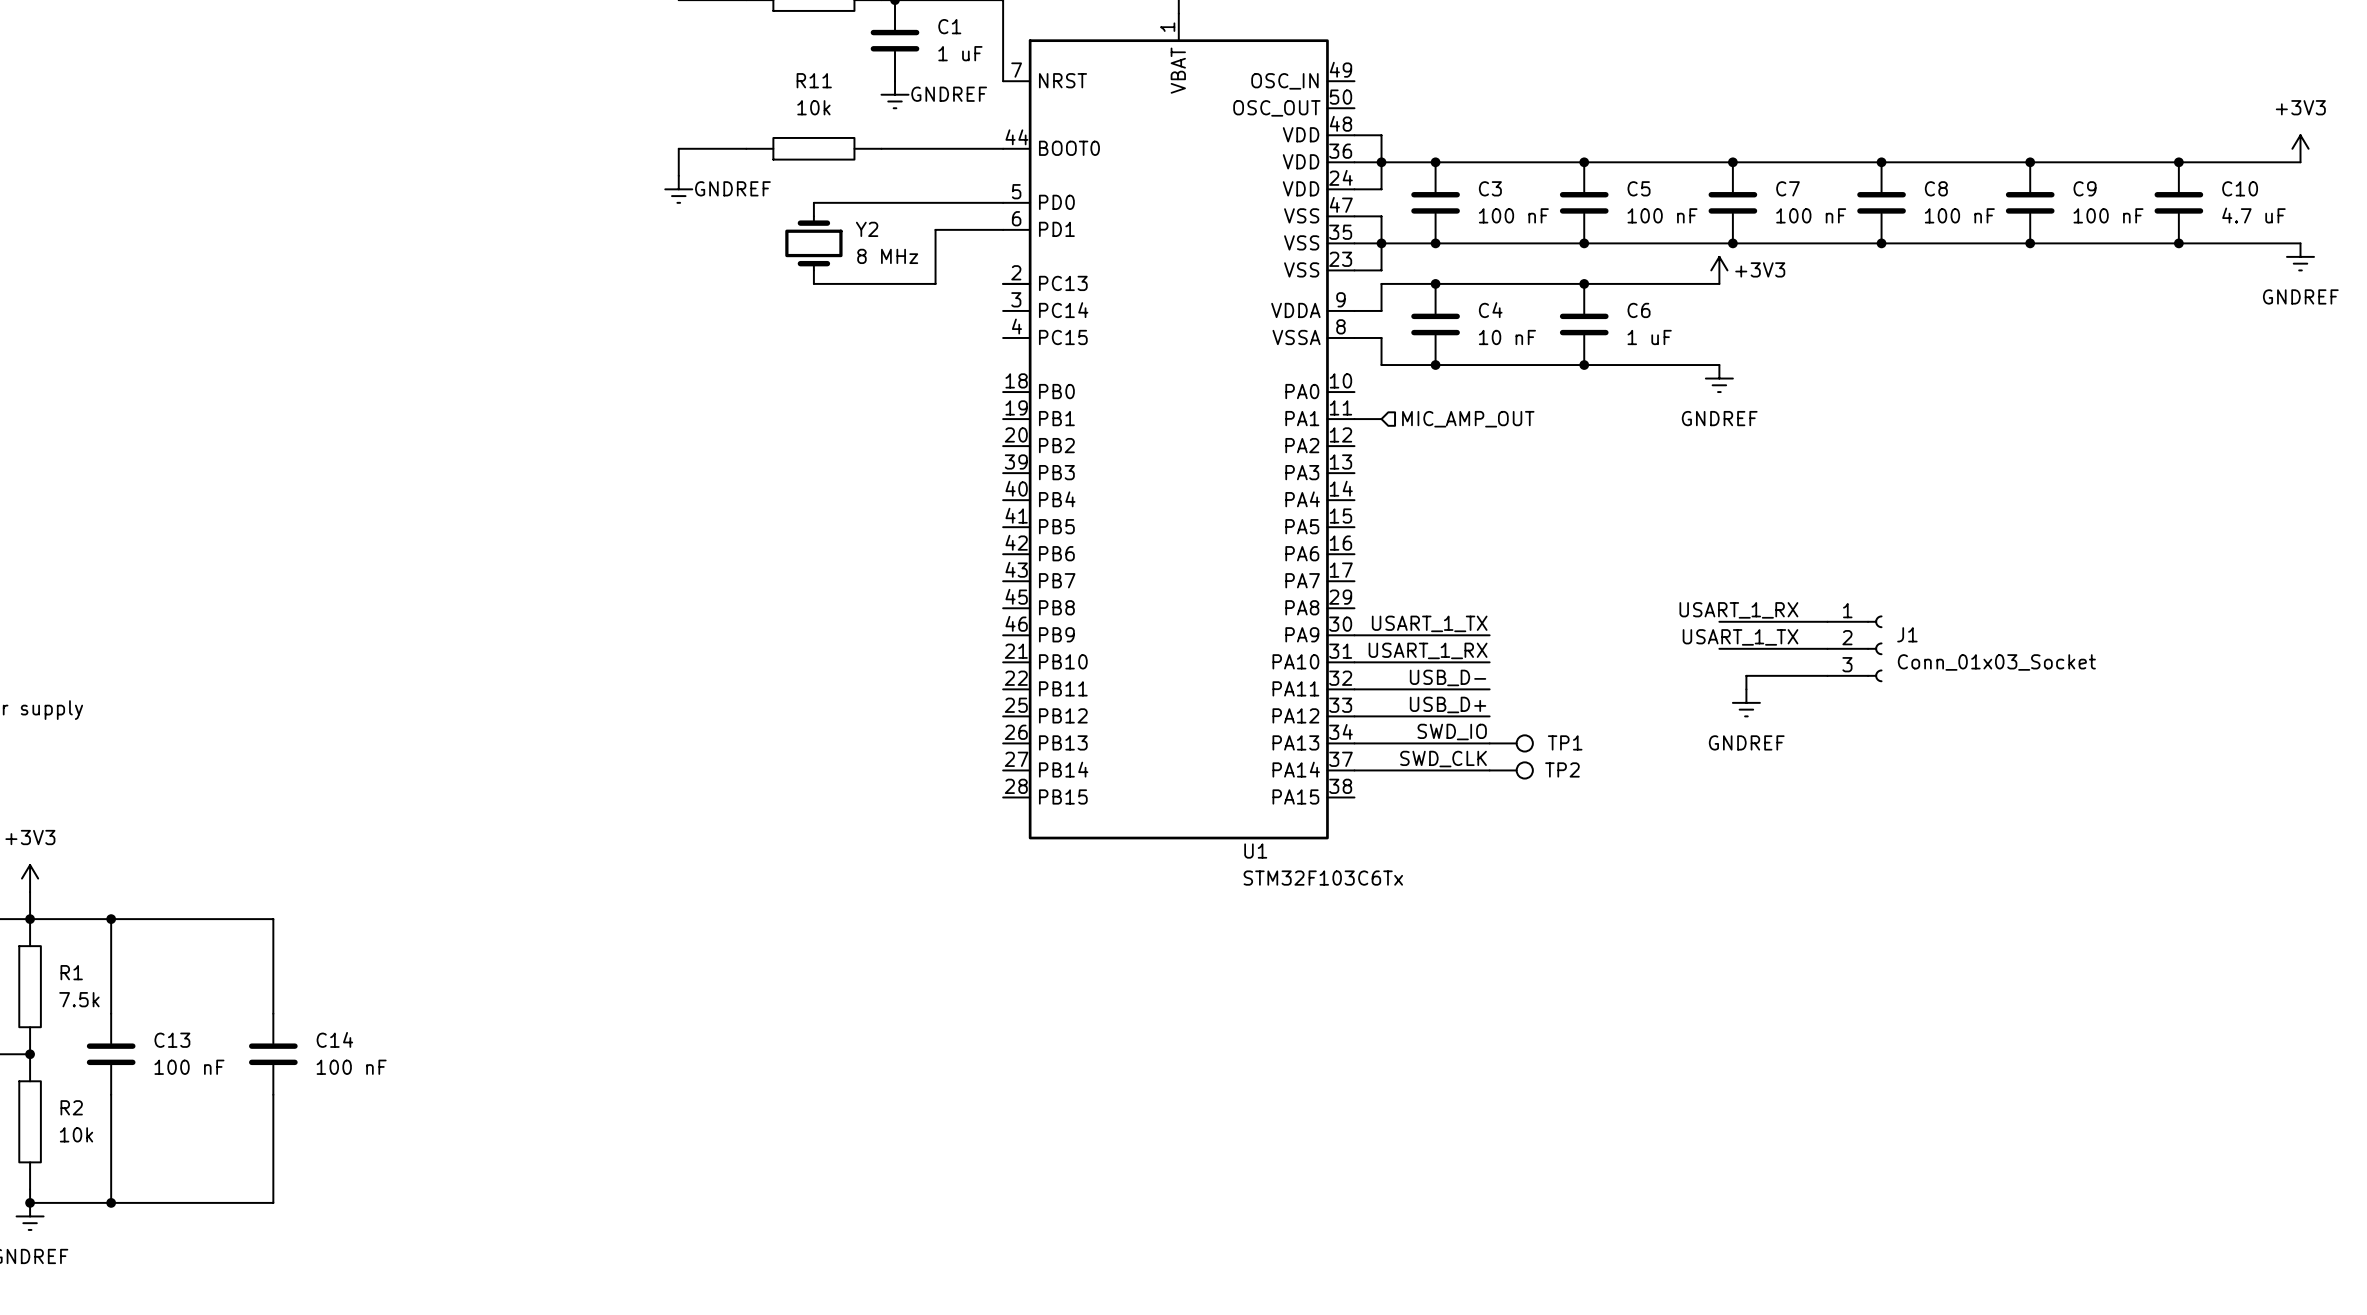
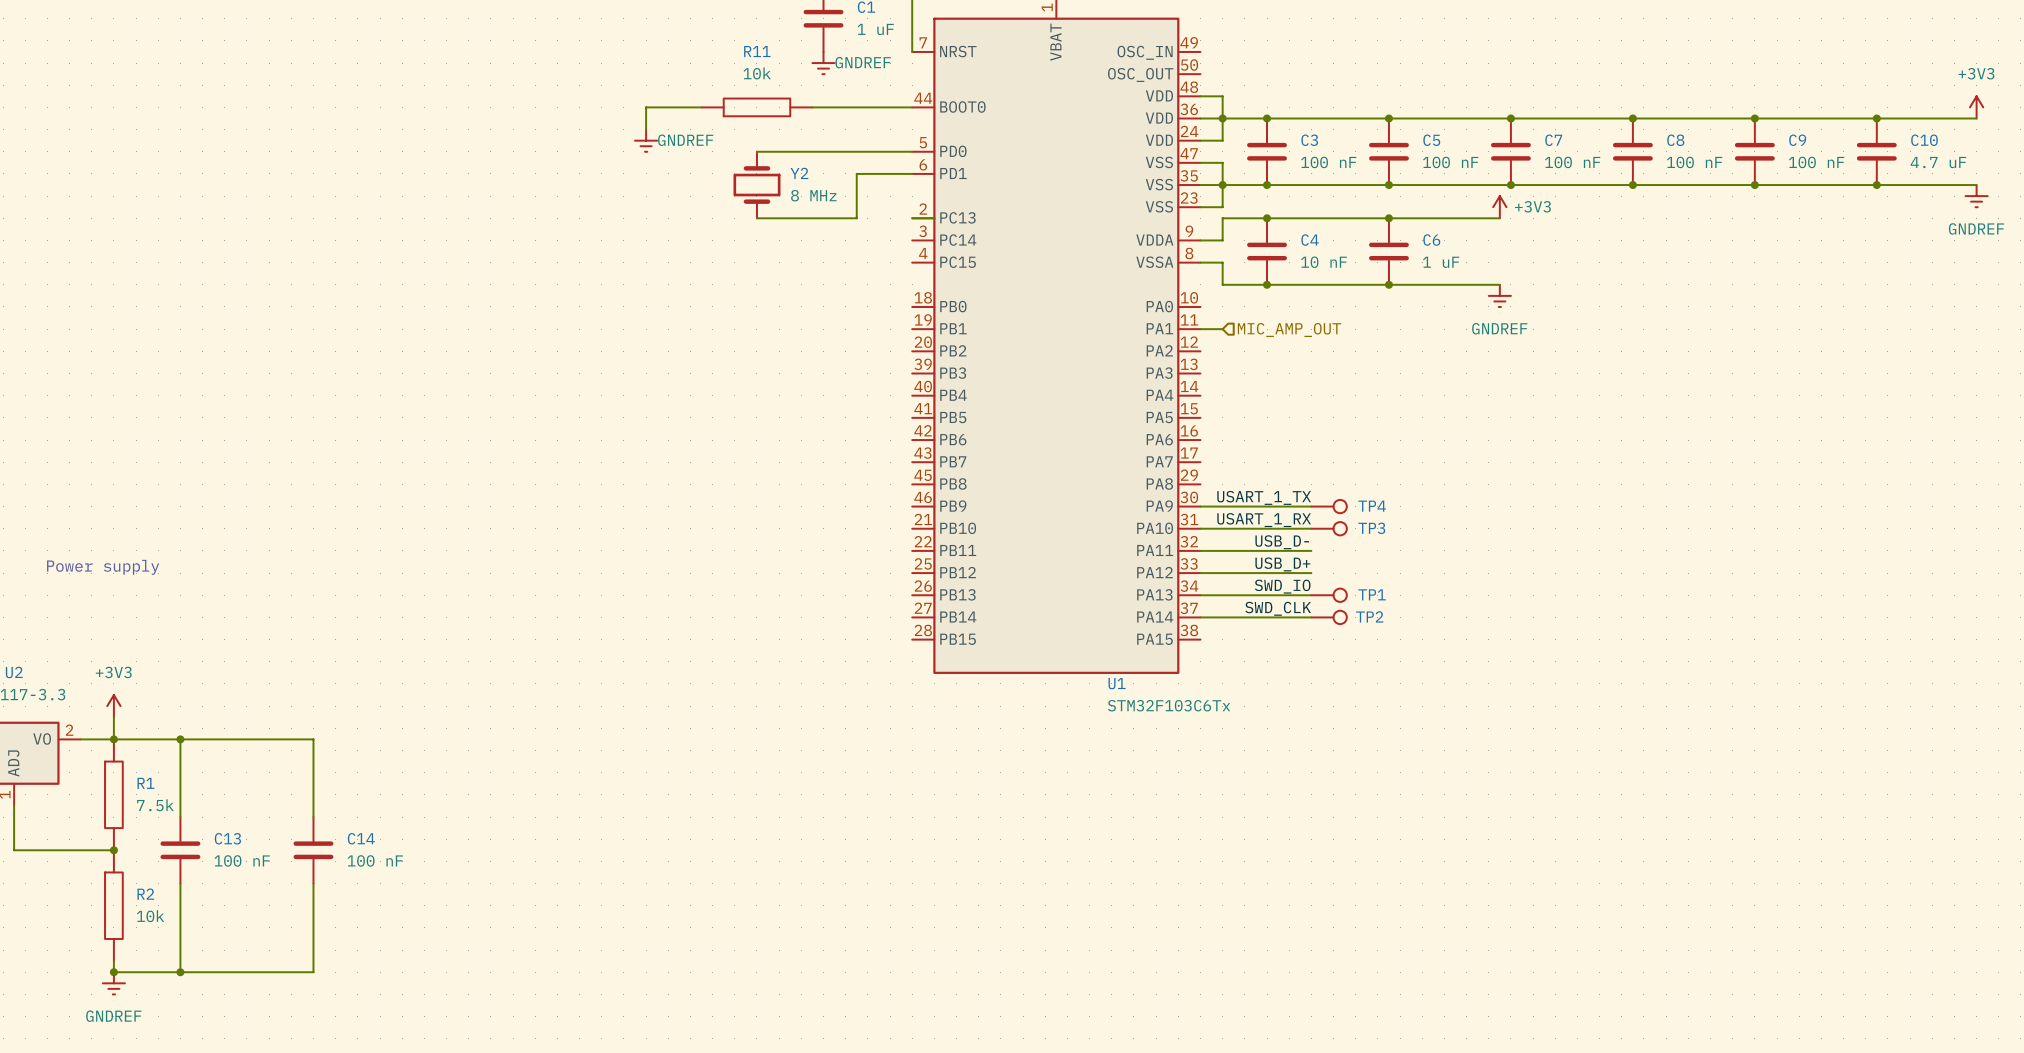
label: USART_1_RX (1738, 610) -> none
wire: (1719, 621) (1827, 621) -> none
TP4: none -> (1329, 506)
label: USART_1_TX (1740, 637) -> none
wire: (1719, 648) (1827, 648) -> none
J1: Conn_01x03_Socket (1854, 648) -> none
TP3: none -> (1329, 528)
wire: (1827, 675) (1746, 675) (1746, 689) -> none
power symbol: GNDREF (1746, 702) -> none

